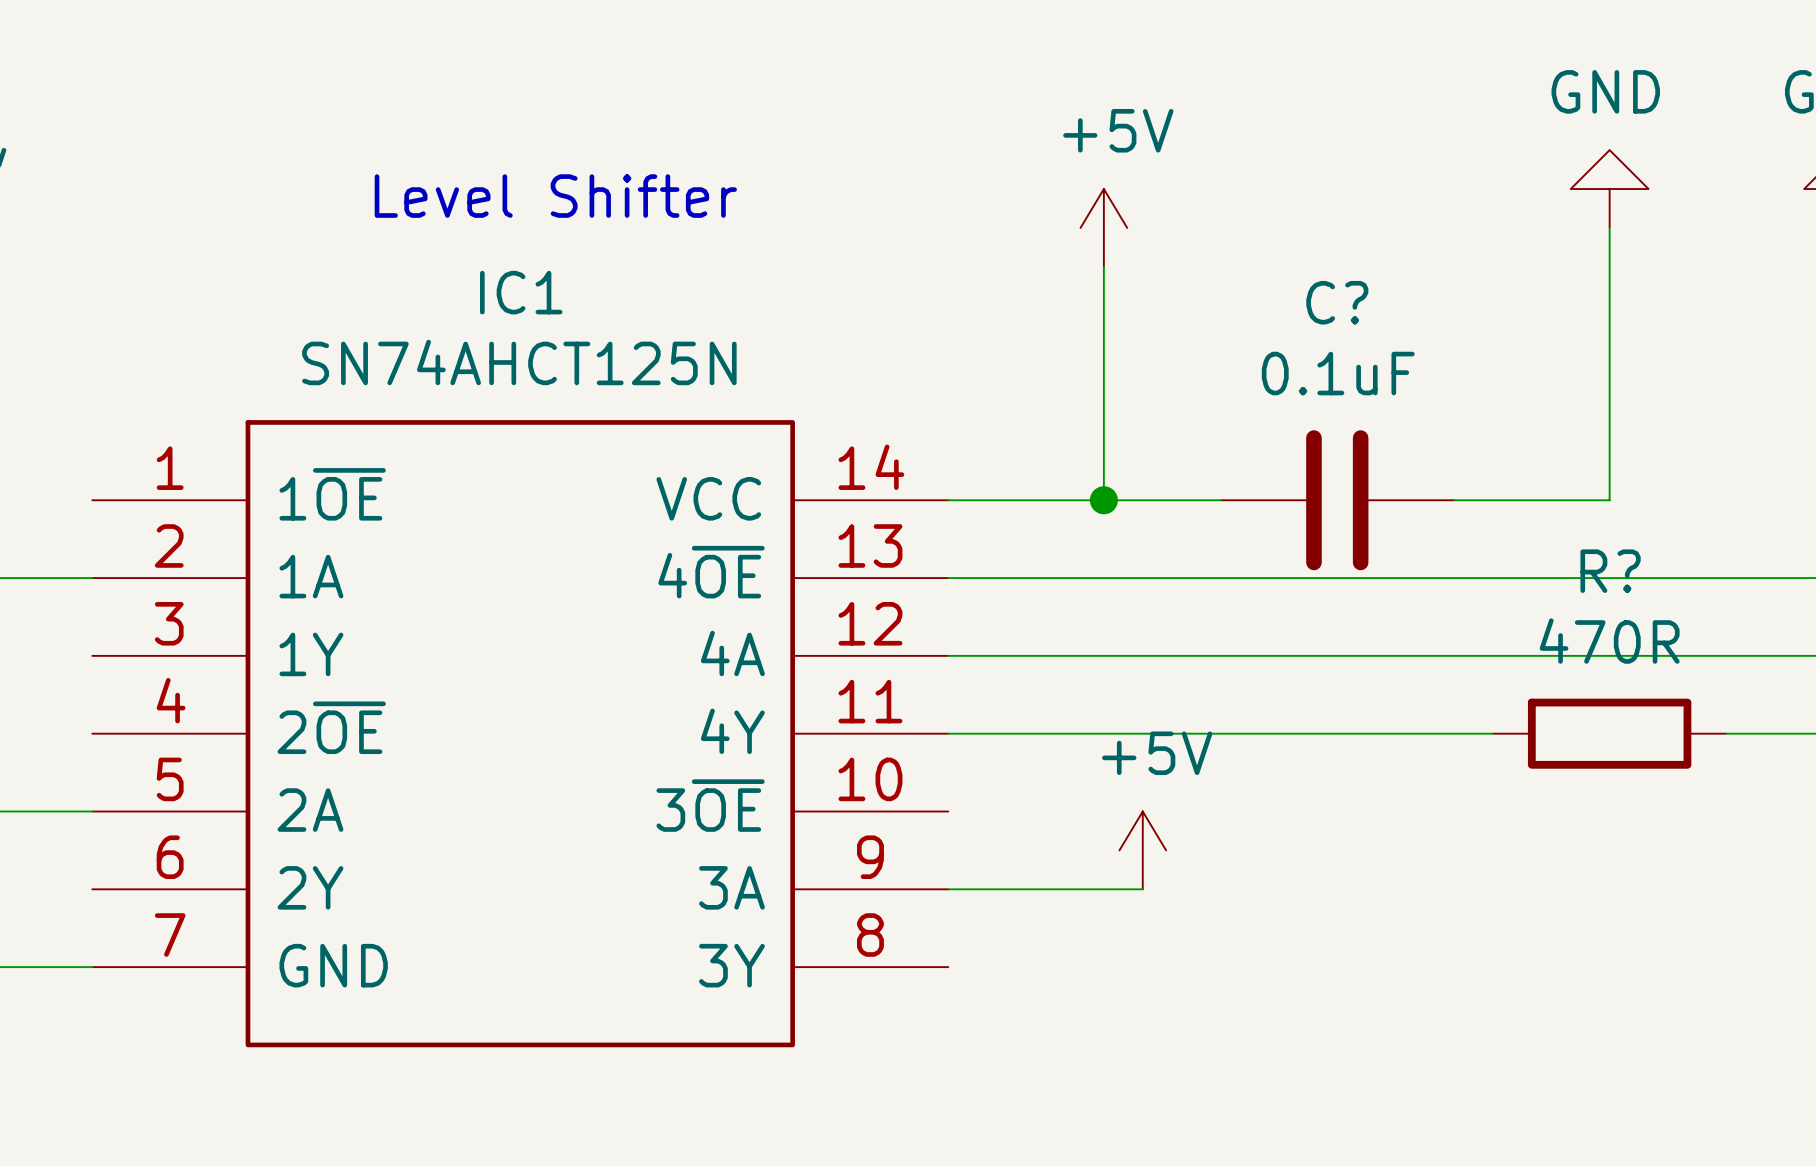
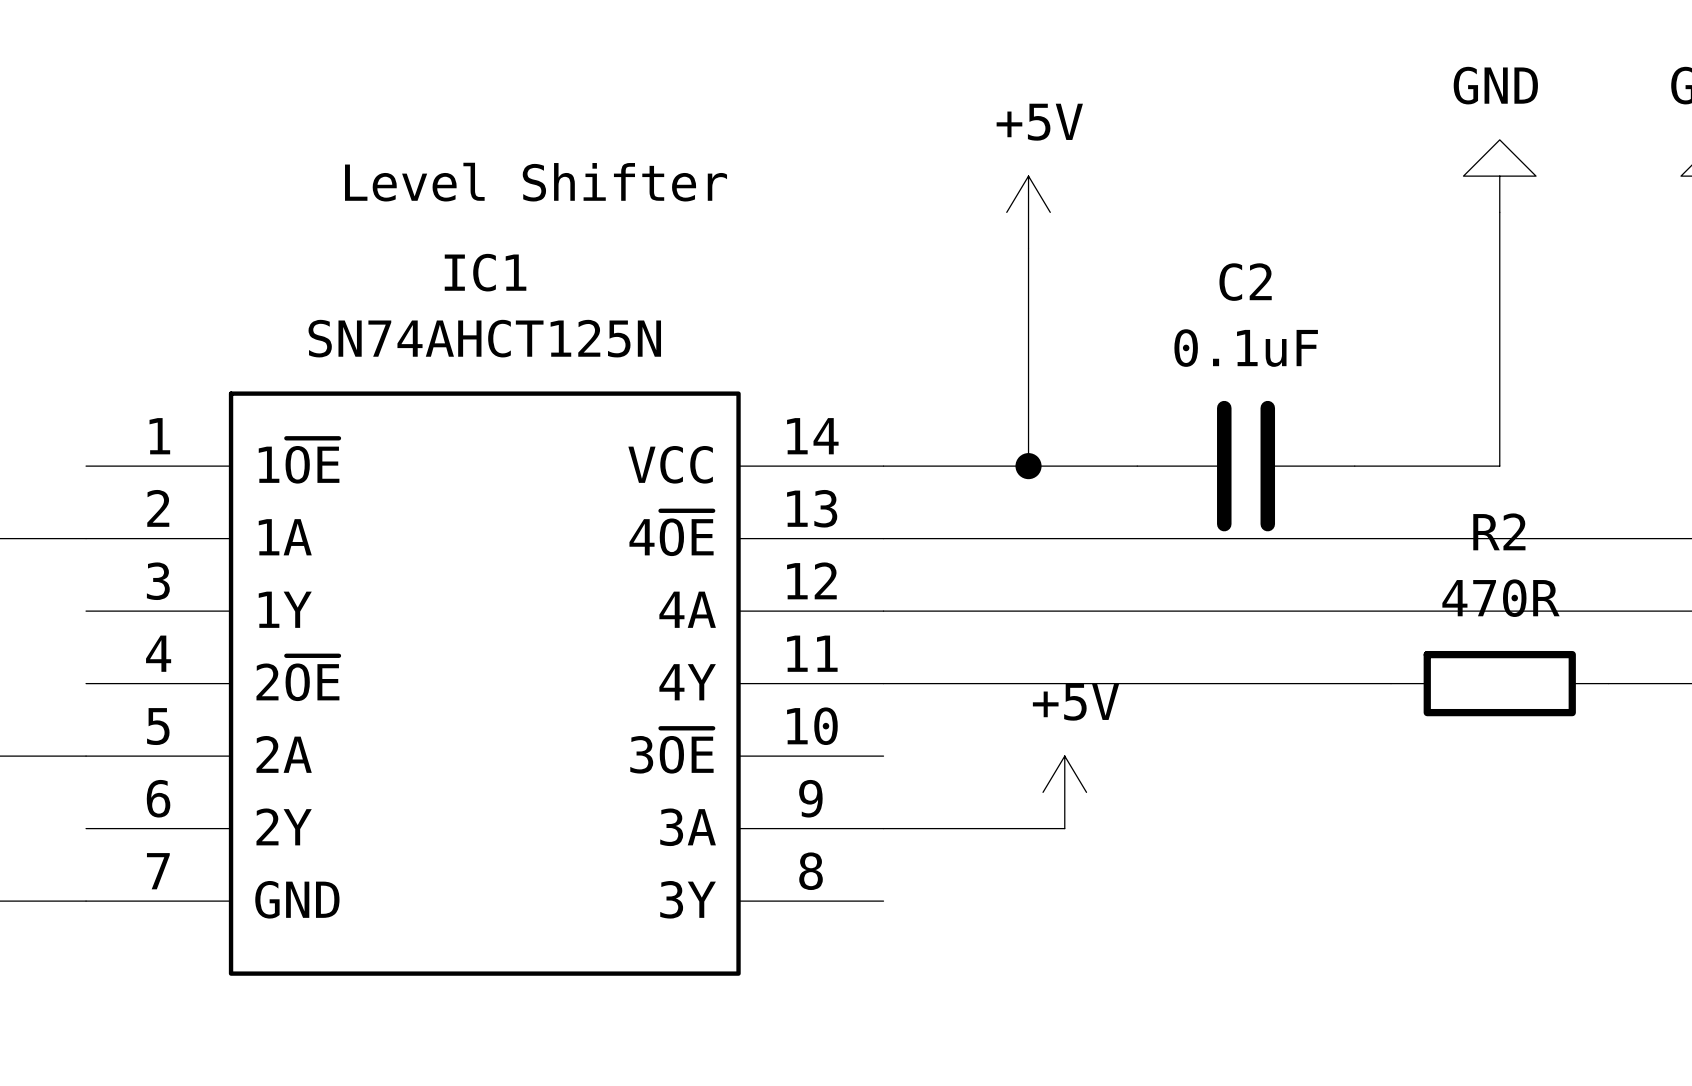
C? name: C? (1337, 302) -> C2 (1245, 282)
R? name: R? (1610, 571) -> R2 (1499, 531)

